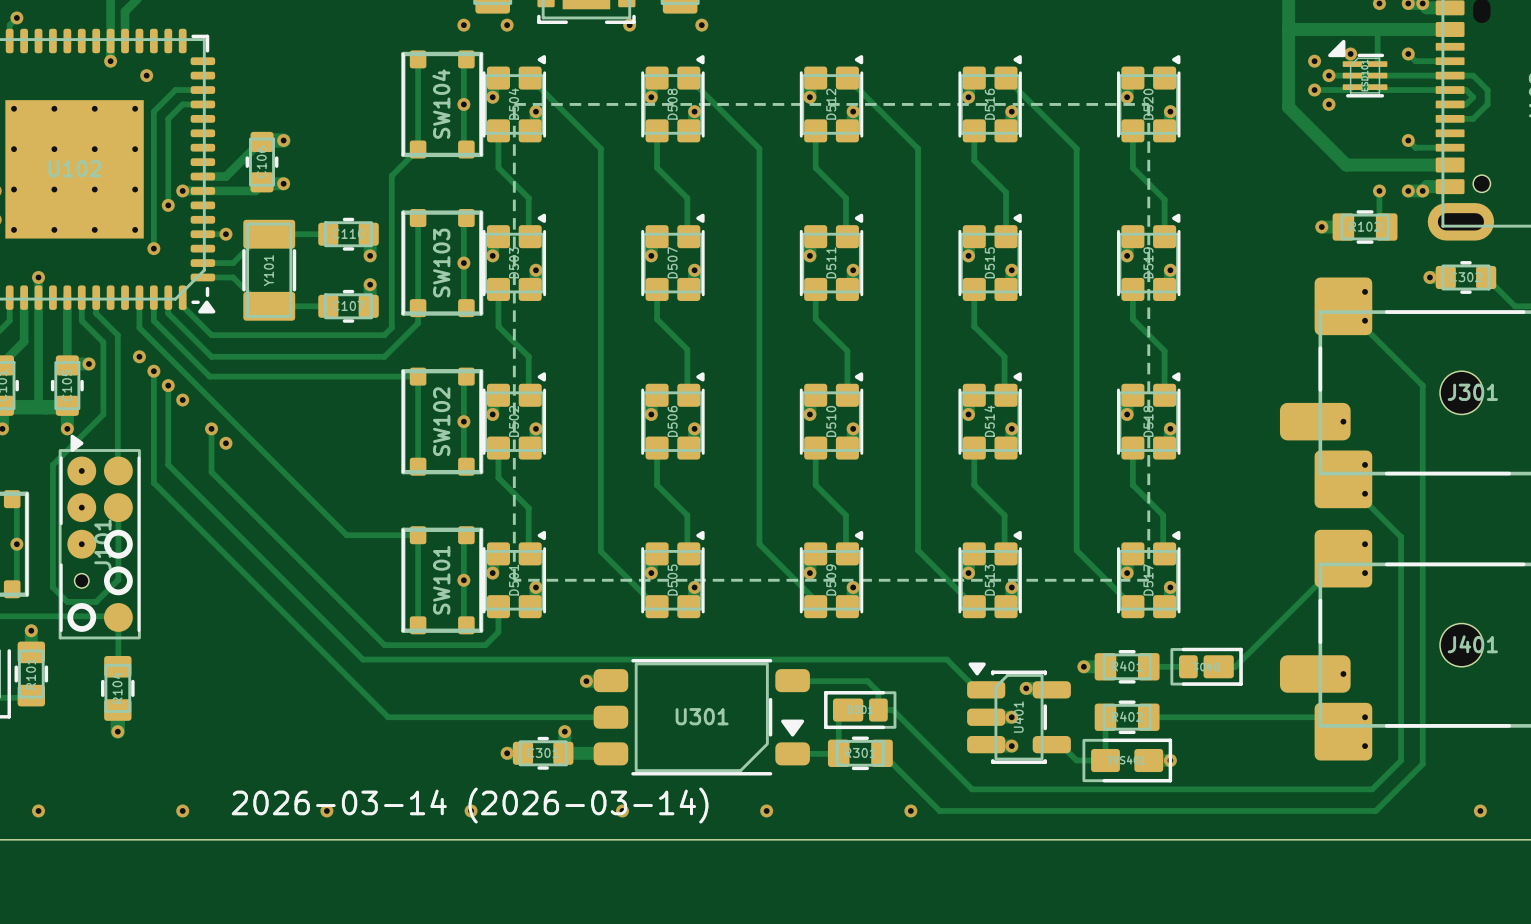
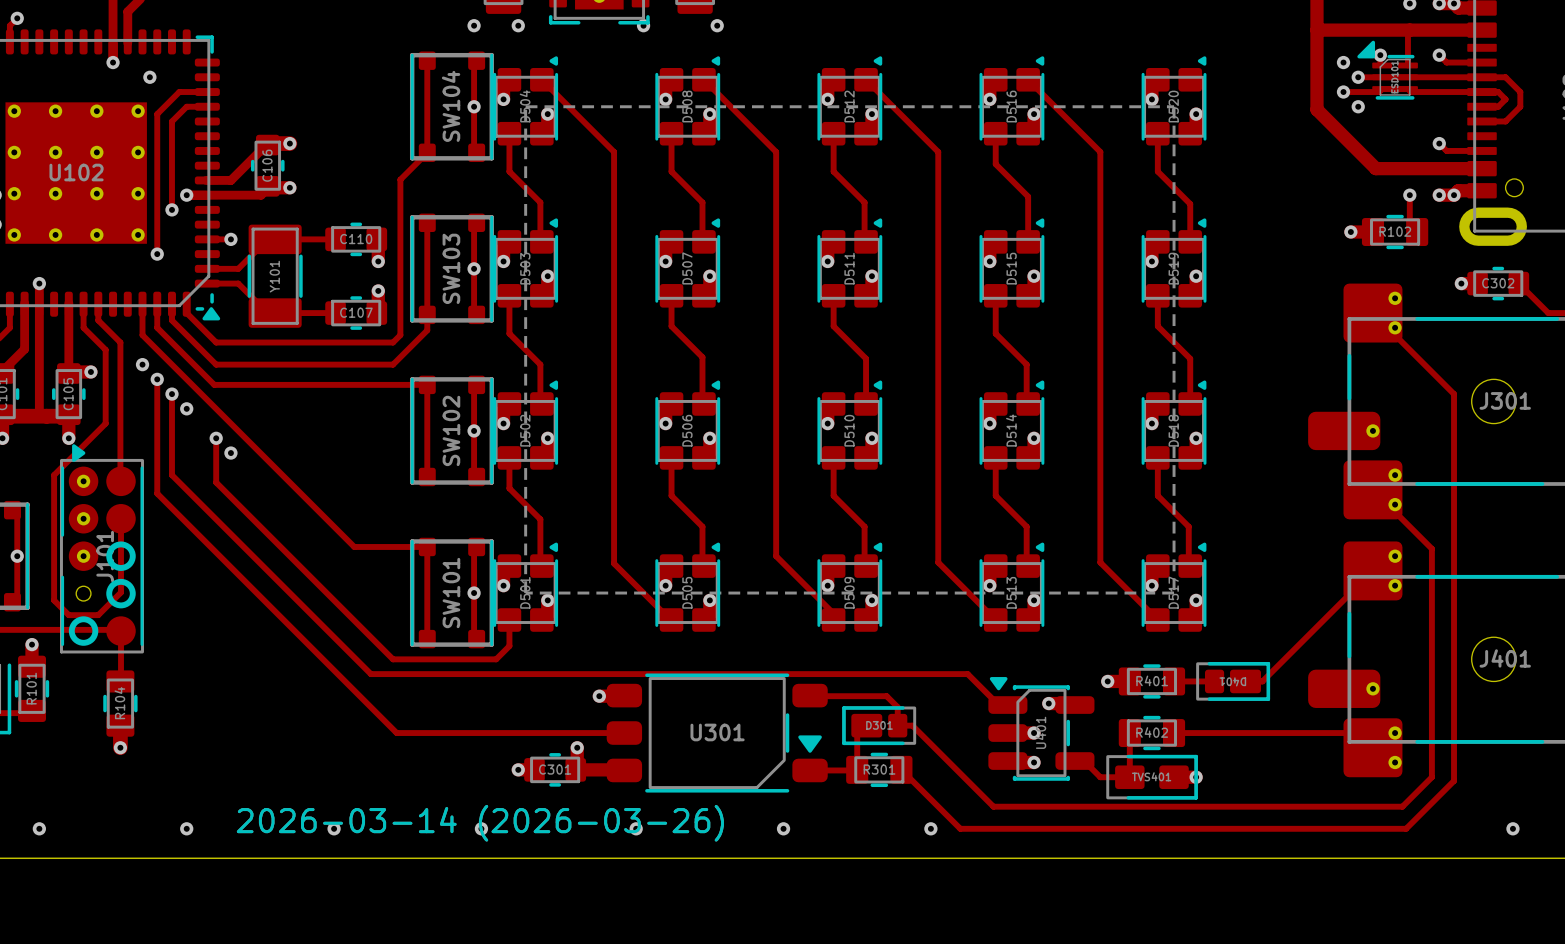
drawing shape: [231, 787, 709, 824] -> [236, 804, 724, 842]

